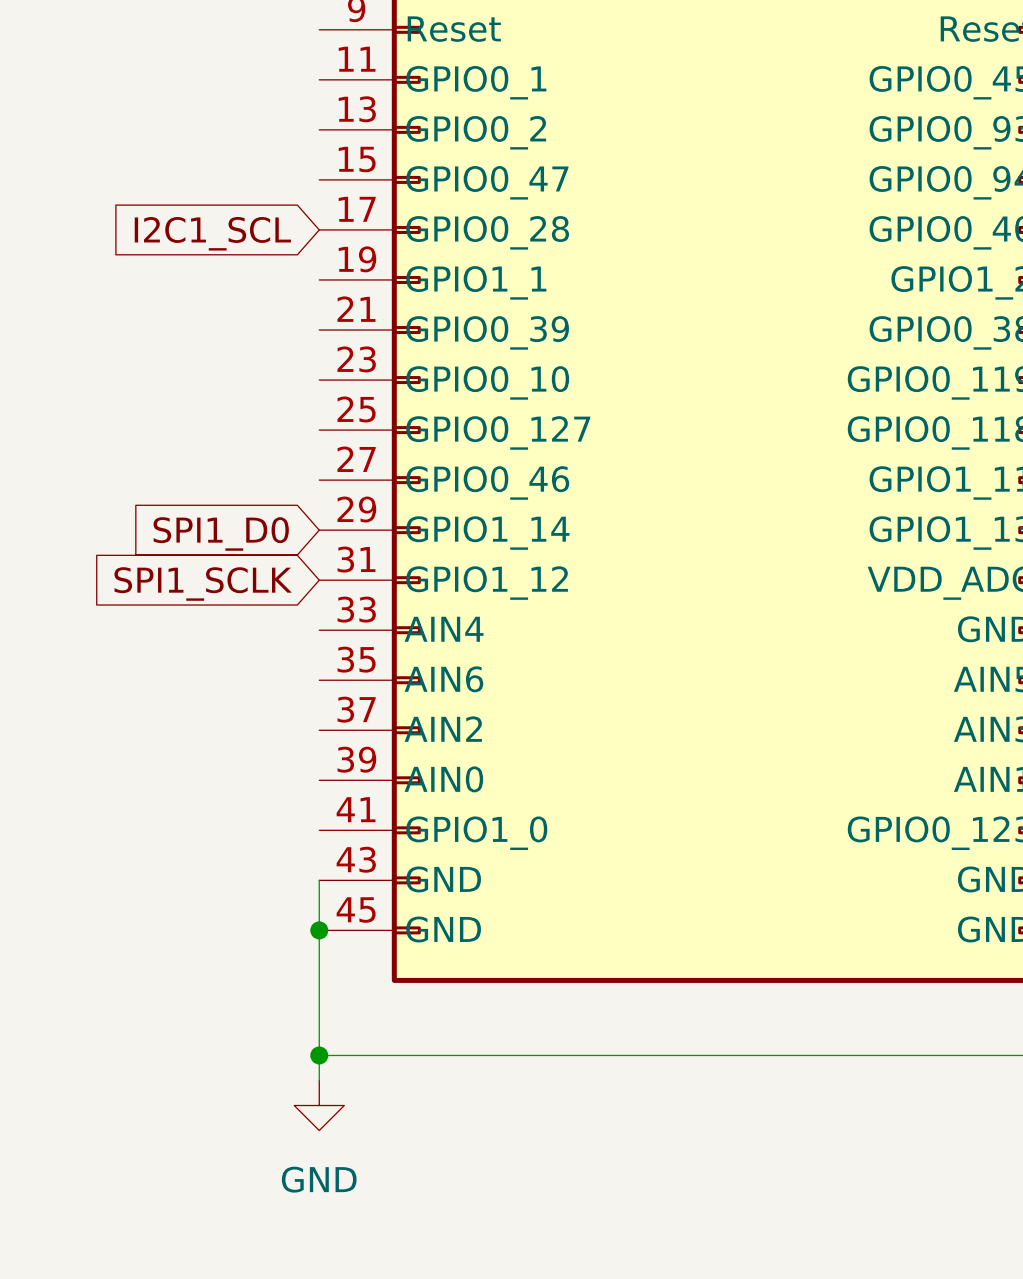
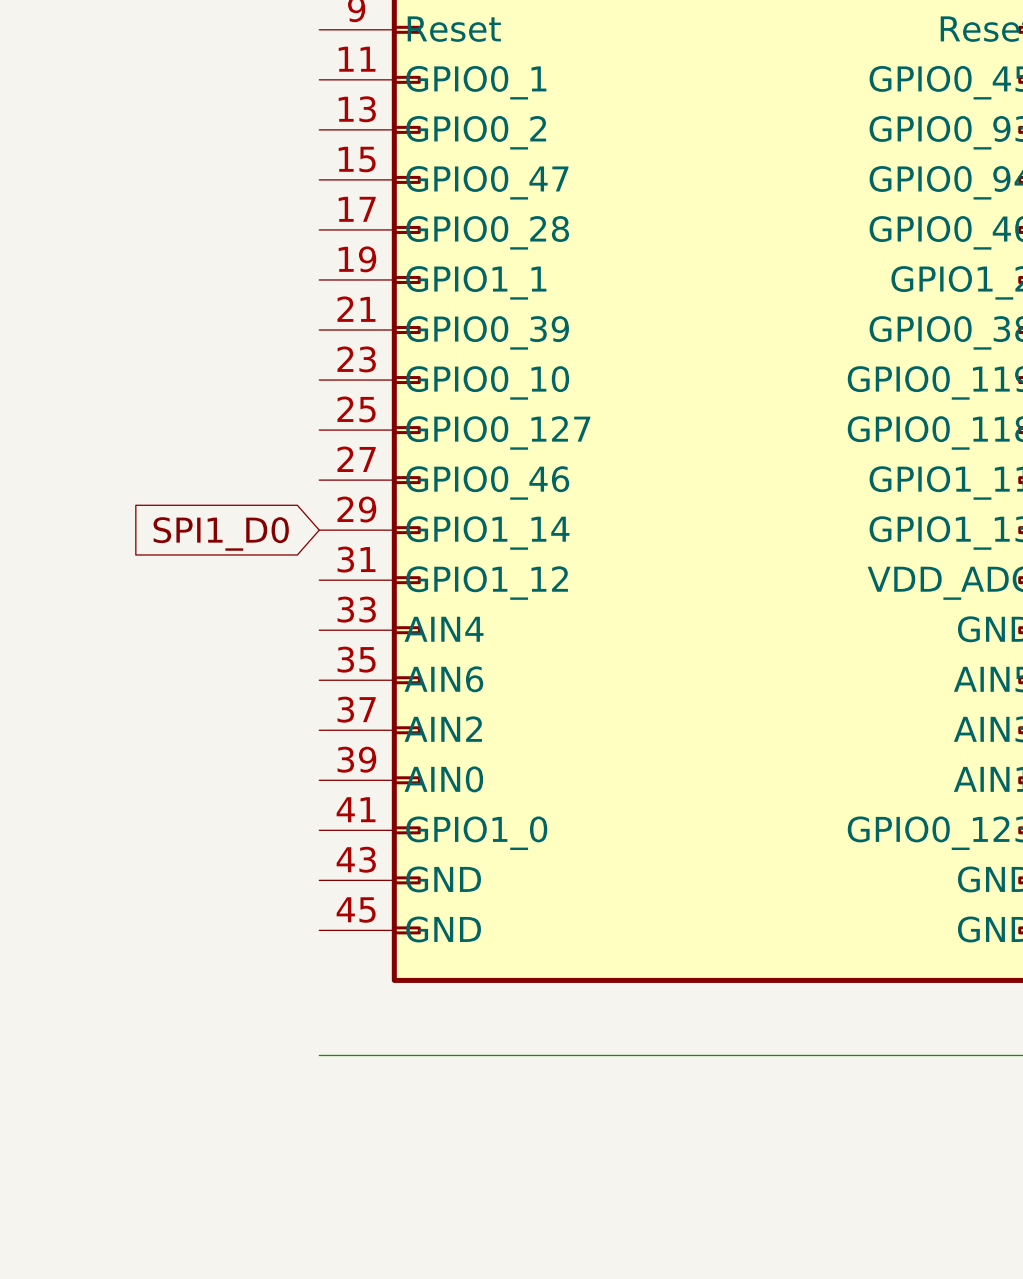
global label: I2C1_SCL (212, 233) -> none
global label: SPI1_SCLK (203, 583) -> none
wire: (319, 880) (319, 1080) -> none
junction: (319, 930) -> none
junction: (319, 1055) -> none
power symbol: GND (319, 1105) -> none

